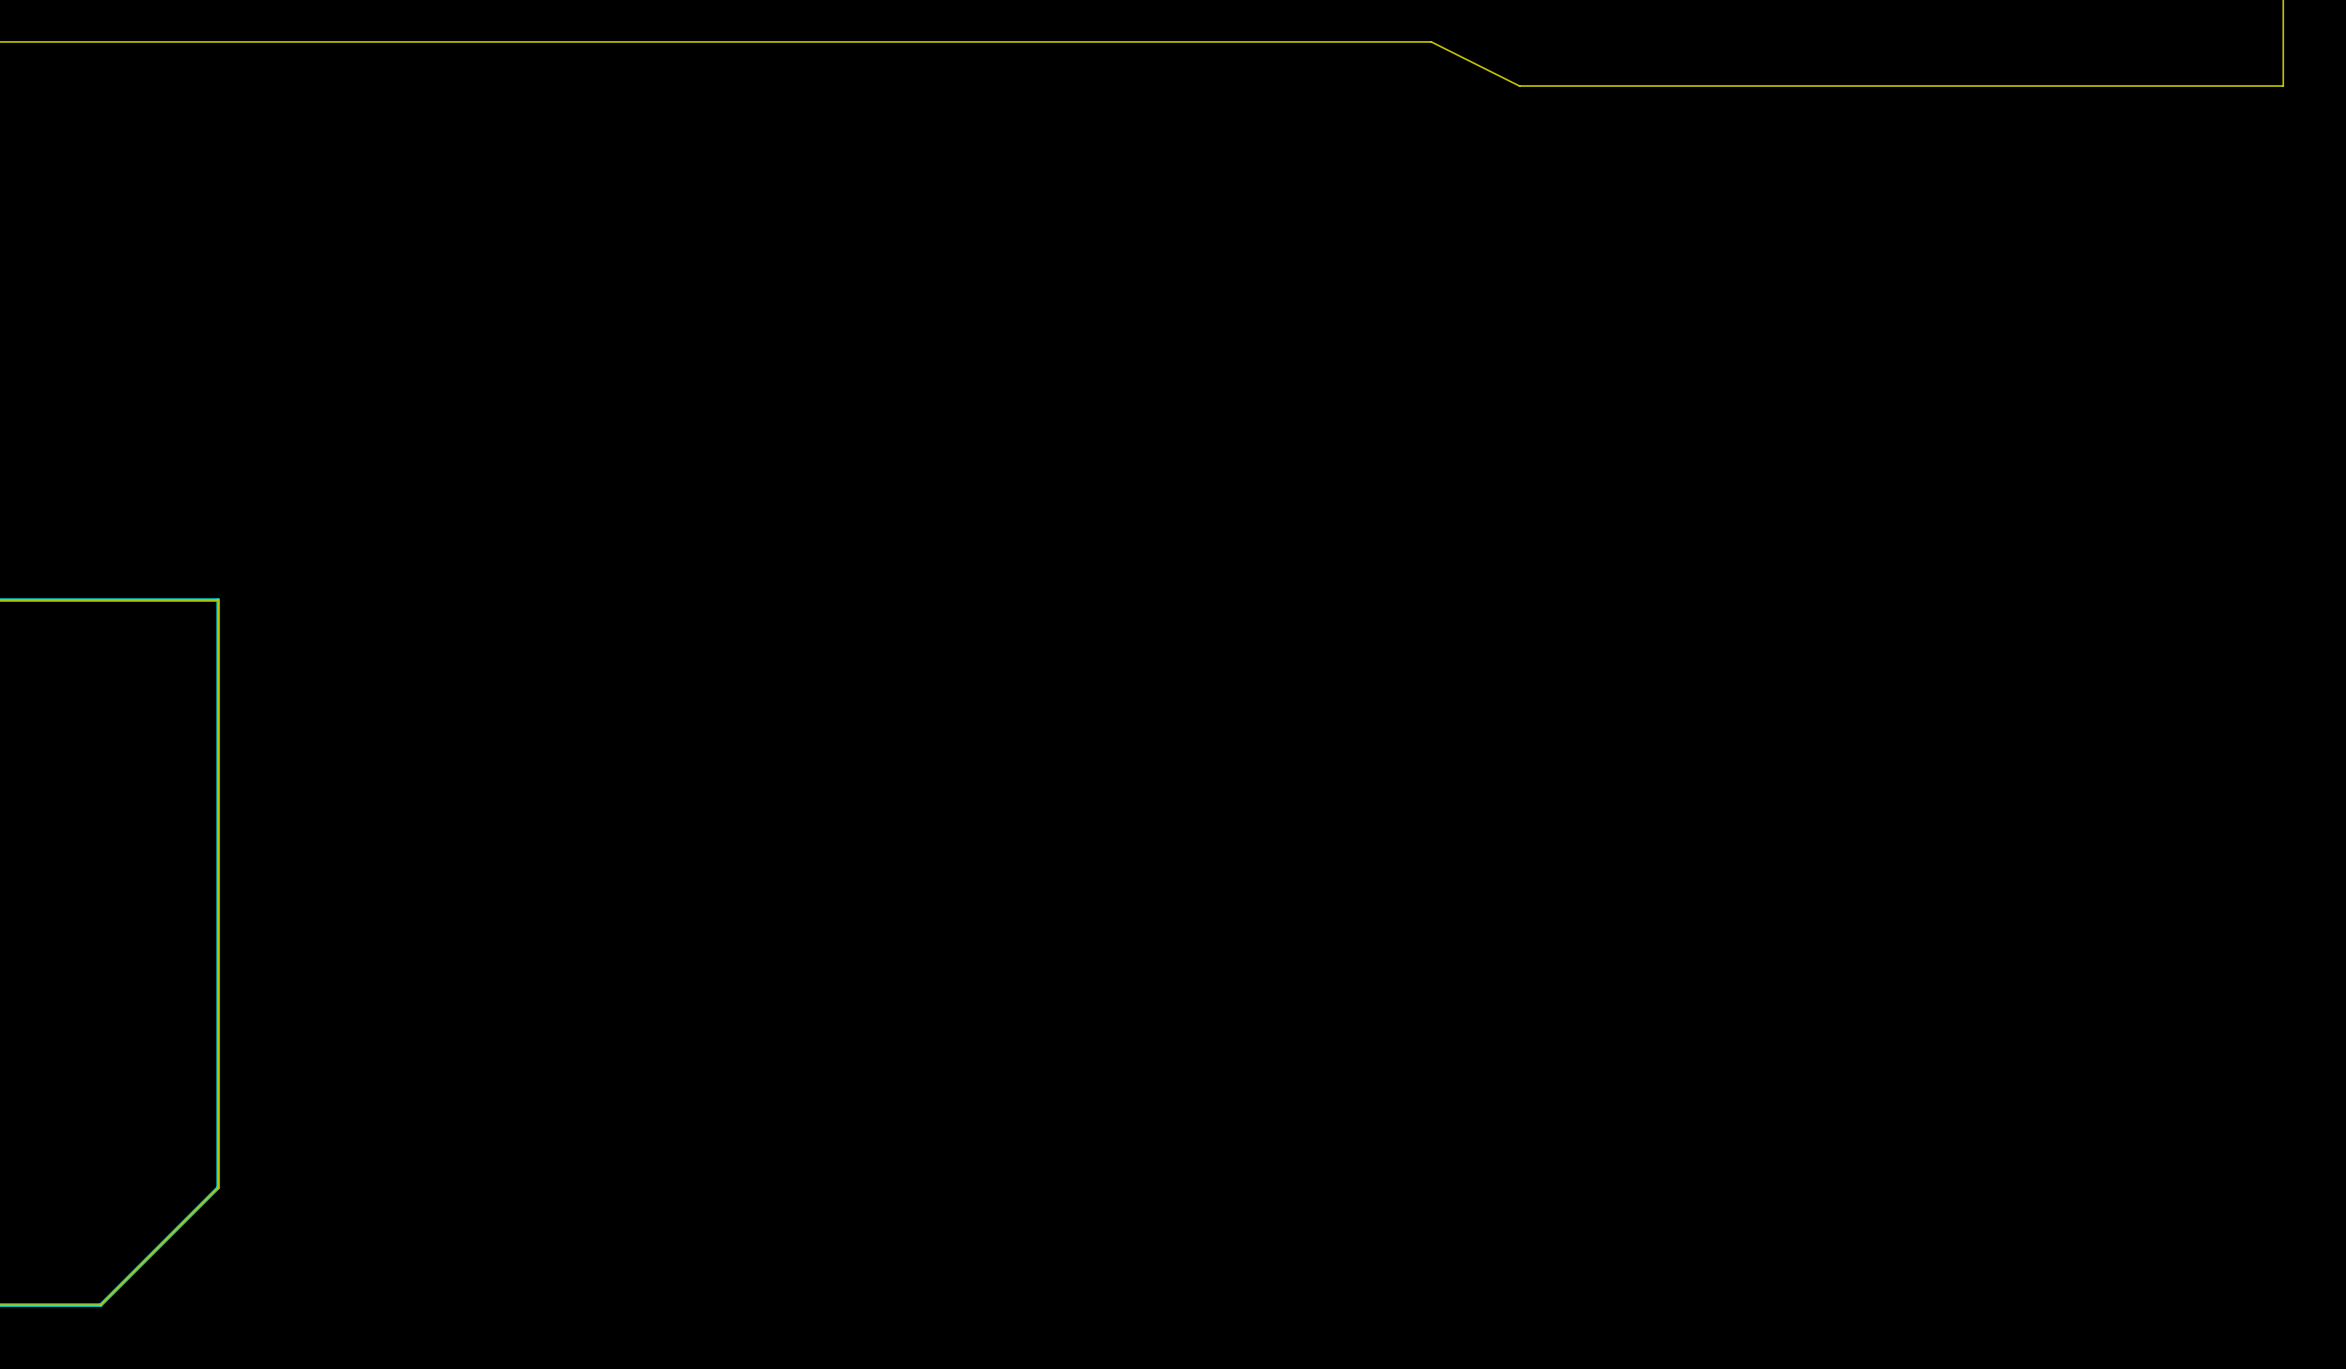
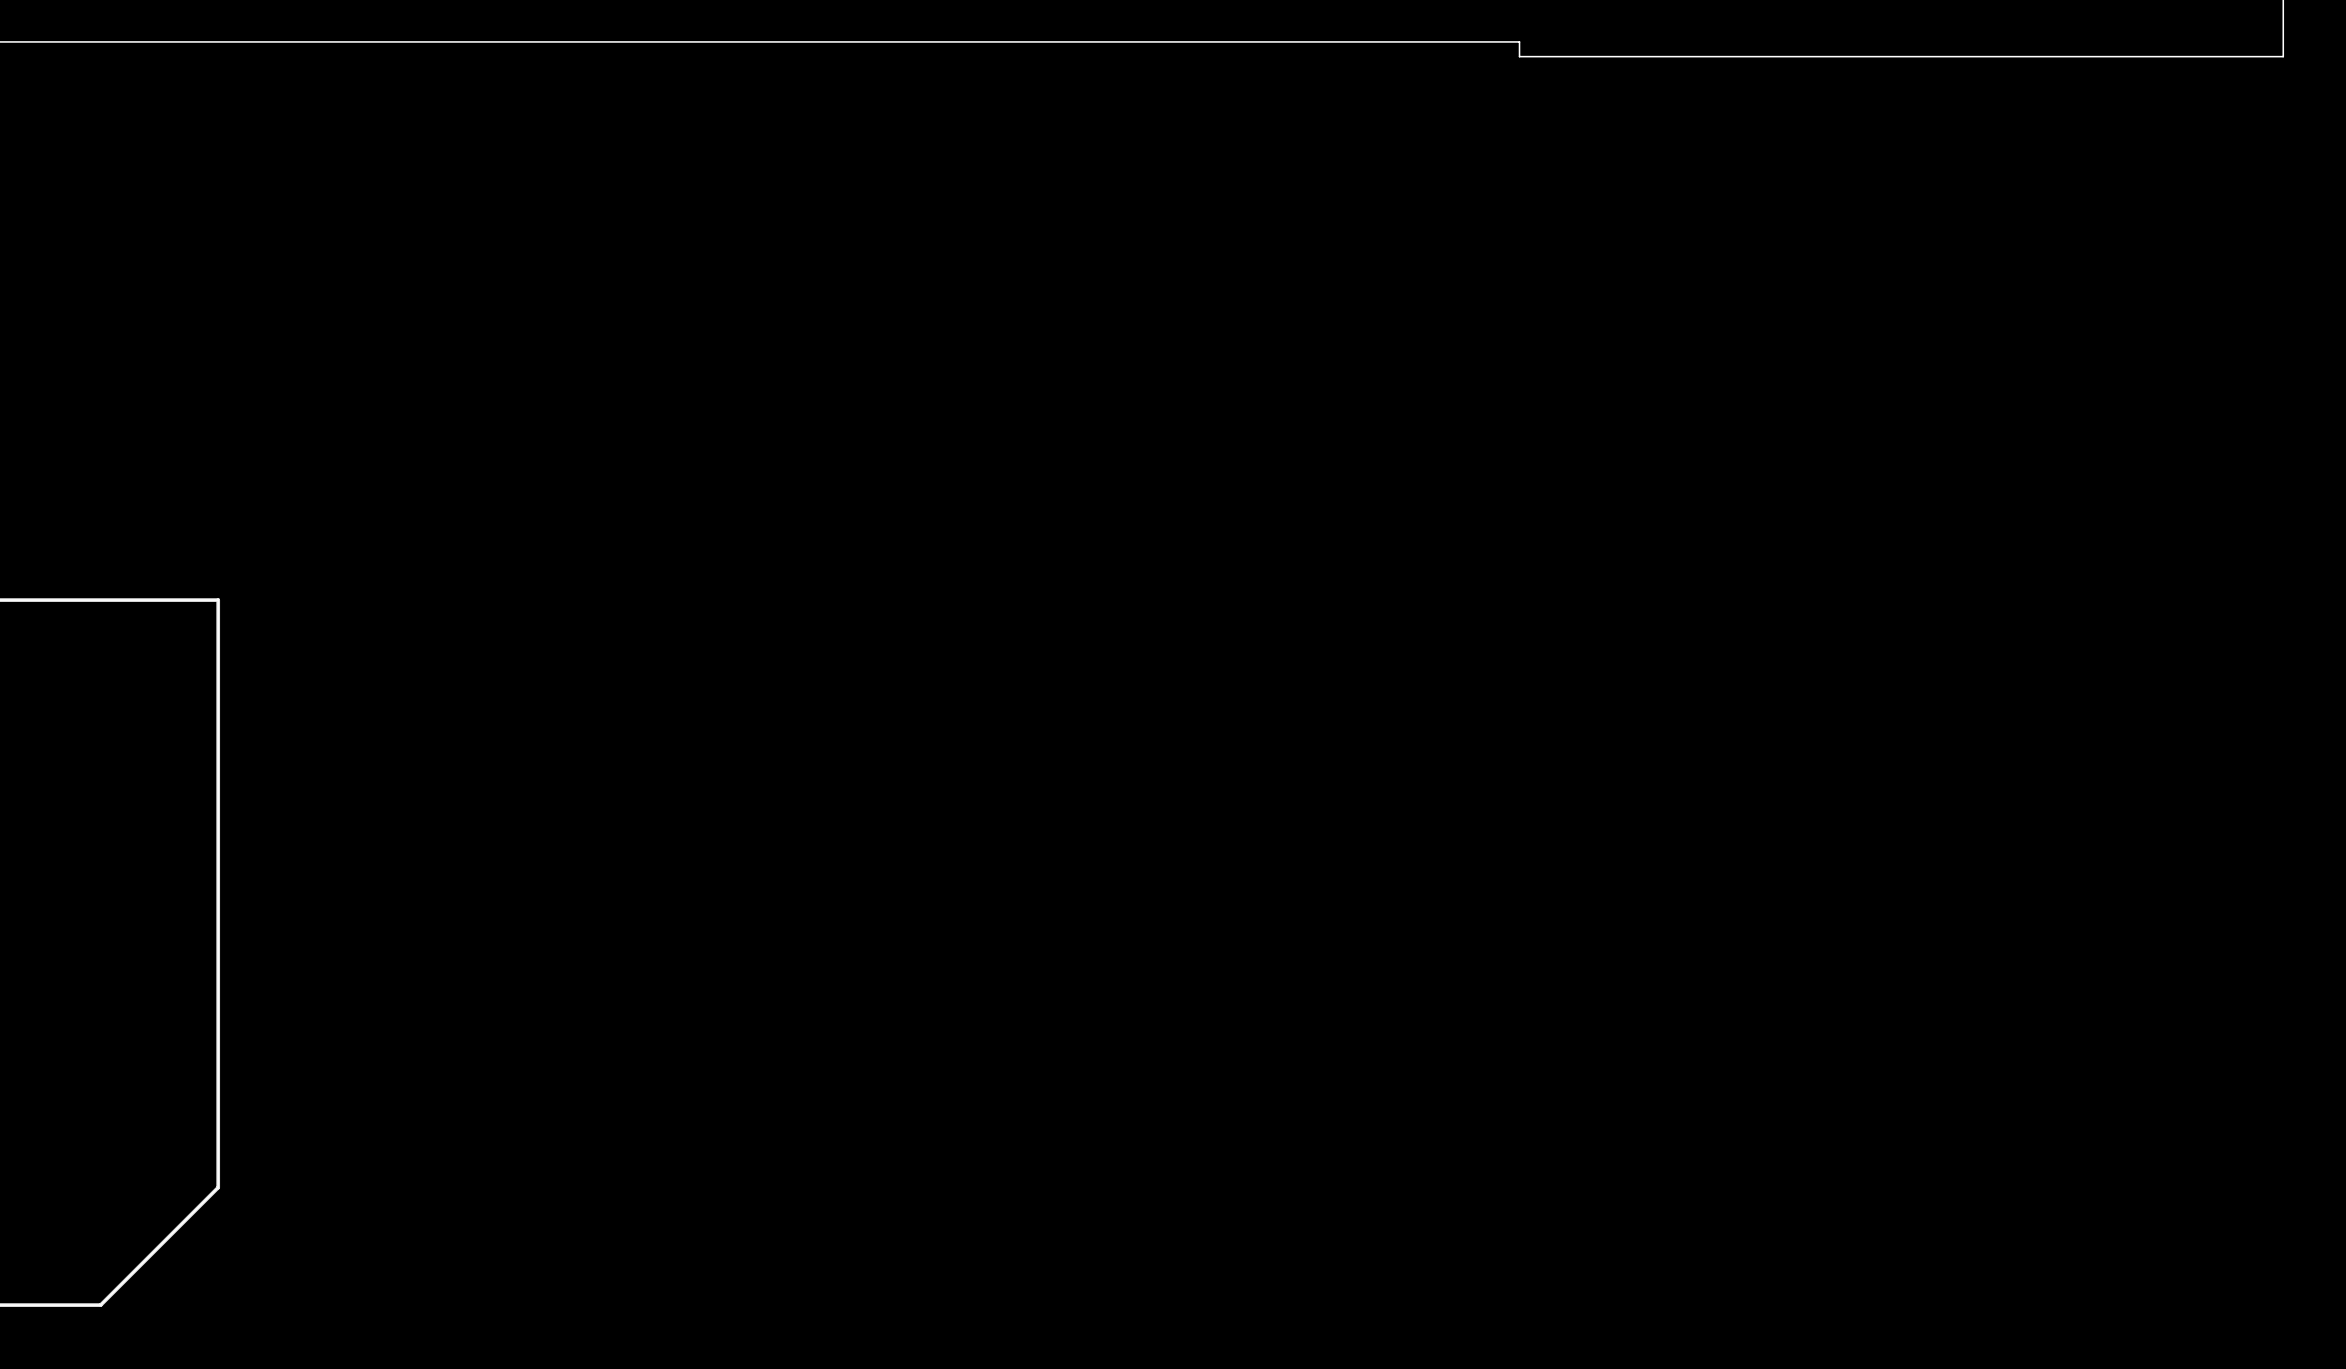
board edge: (1431, 41) (1519, 86) (2283, 86) (2283, 56) -> (1431, 41) (1519, 41) (1519, 56) (2283, 56)

